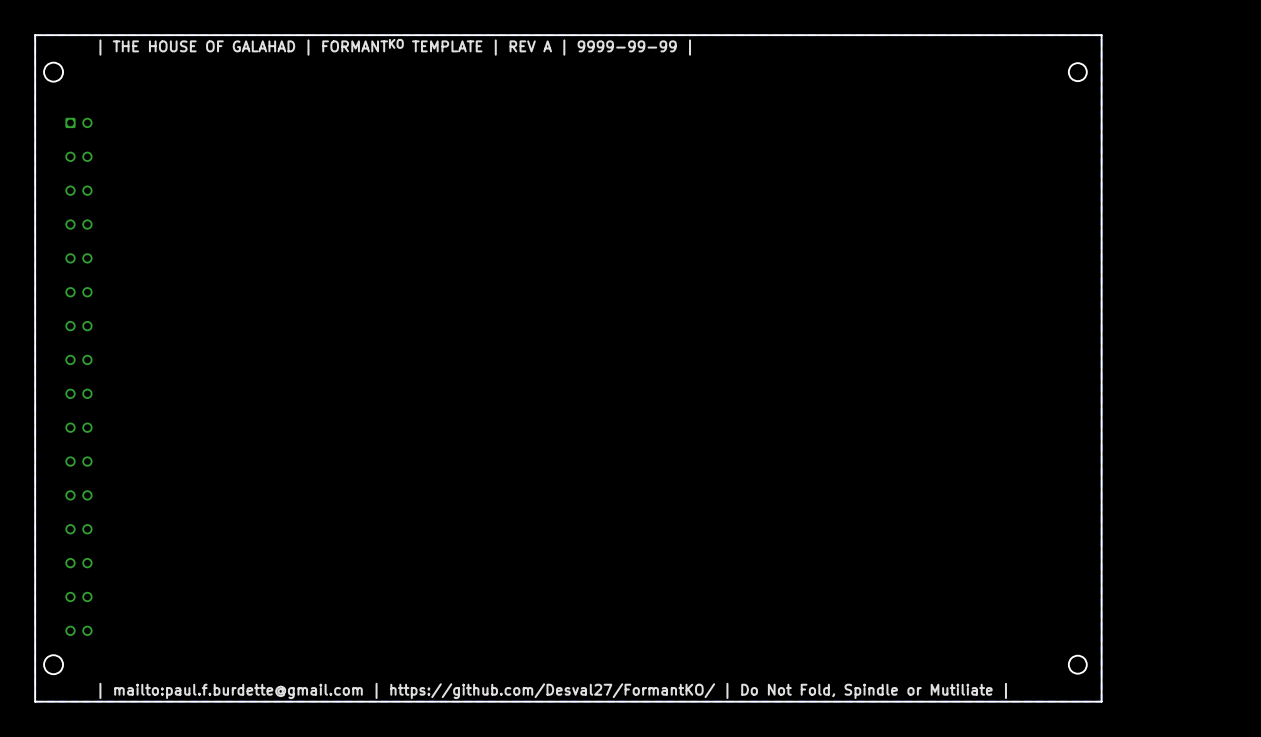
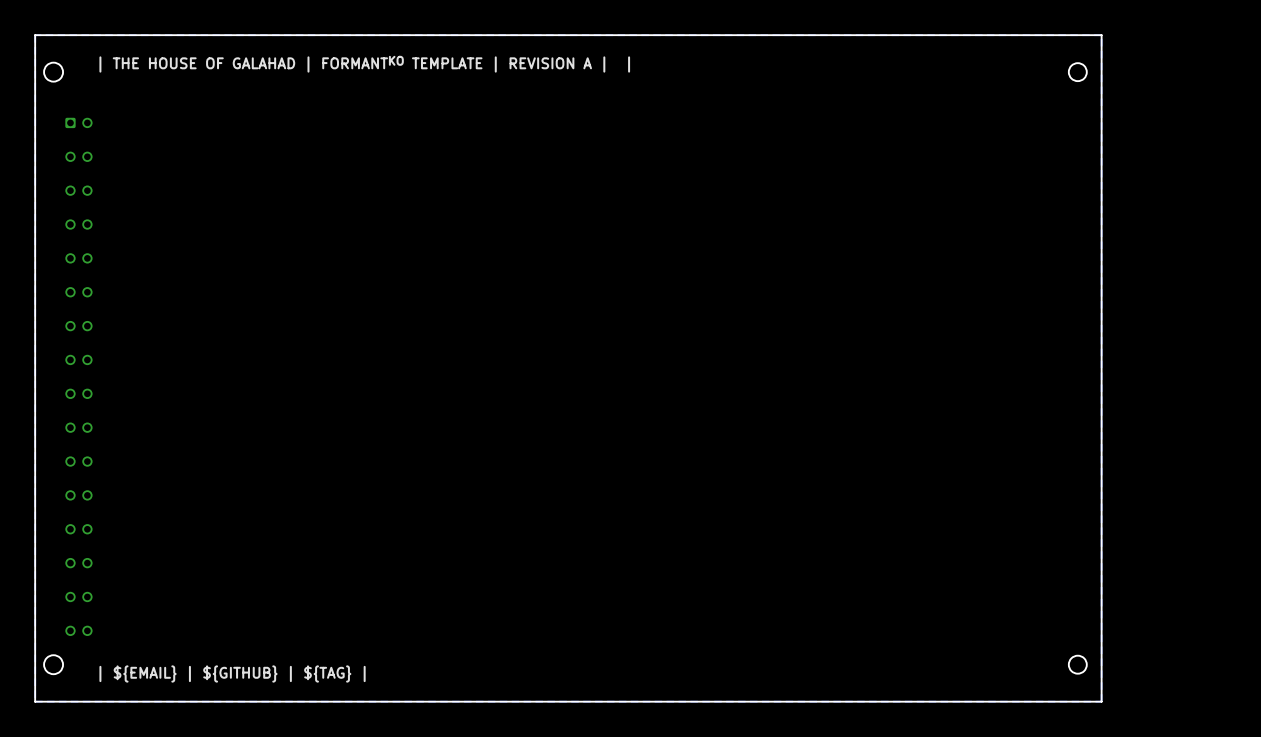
text: | THE HOUSE OF GALAHAD | FORMANTKO TEMPLATE | REV A | 9999-99-99 | (395, 47) -> | THE HOUSE OF GALAHAD | FORMANTKO TEMPLATE | REVISION A | | (364, 64)
text: none -> | ${EMAIL} | ${GITHUB} | ${TAG} | (232, 673)
text: | mailto:paul.f.burdette@gmail.com | https://github.com/Desval27/FormantKO/ | Do Not Fold, Spindle or Mutiliate | (553, 690) -> none

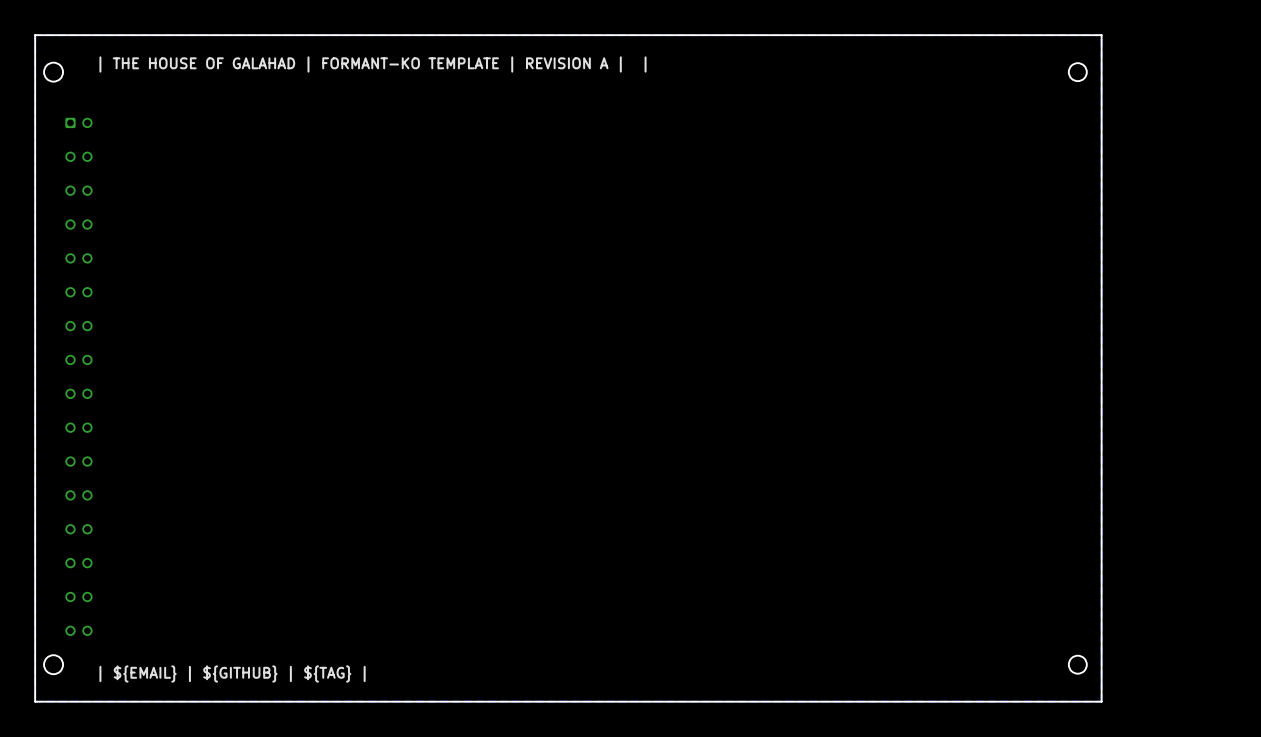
text: | THE HOUSE OF GALAHAD | FORMANTKO TEMPLATE | REVISION A | | (364, 64) -> | THE HOUSE OF GALAHAD | FORMANT-KO TEMPLATE | REVISION A | | (372, 64)

